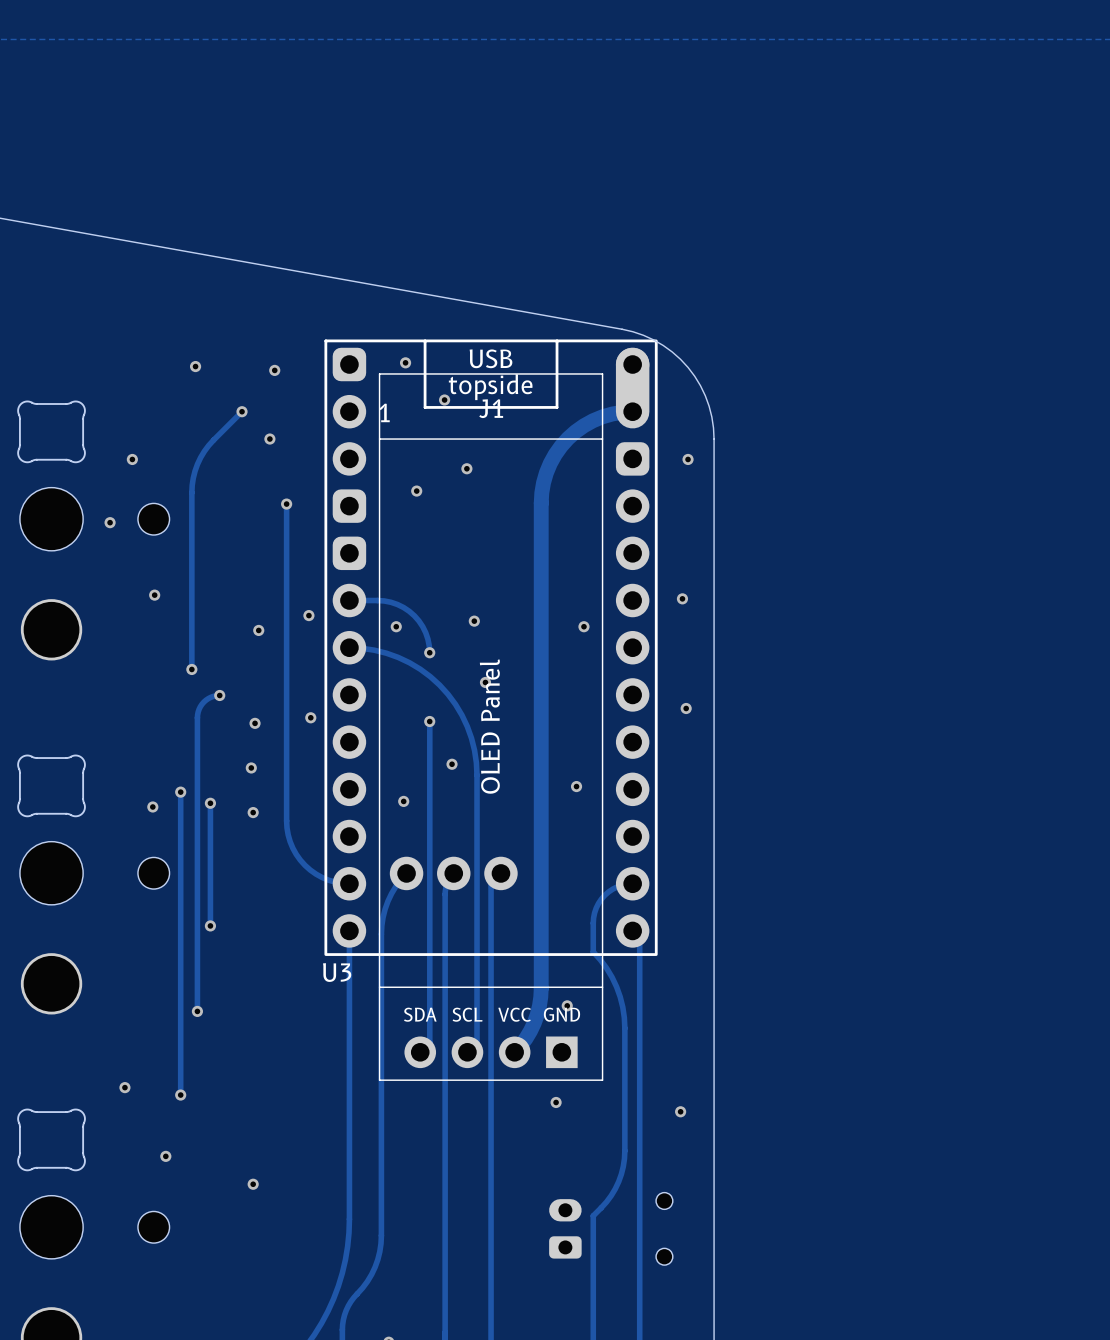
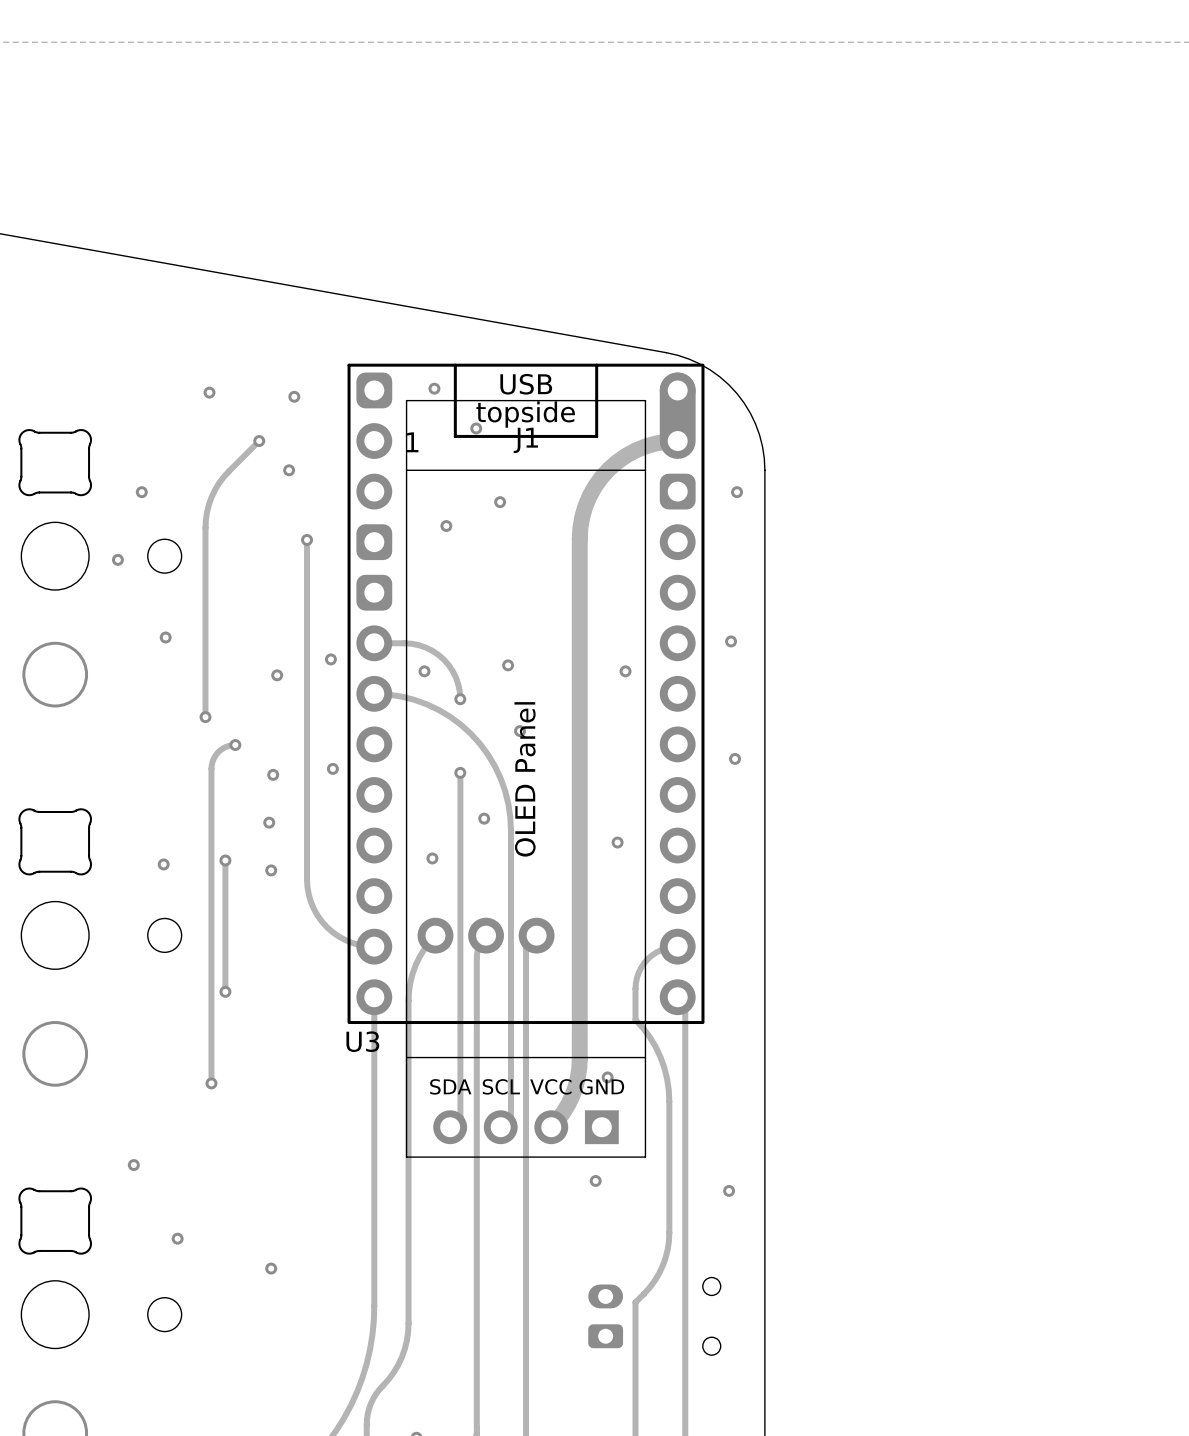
track: (180, 792) (180, 1095) -> none
via: (180, 792) -> none
via: (180, 1095) -> none

